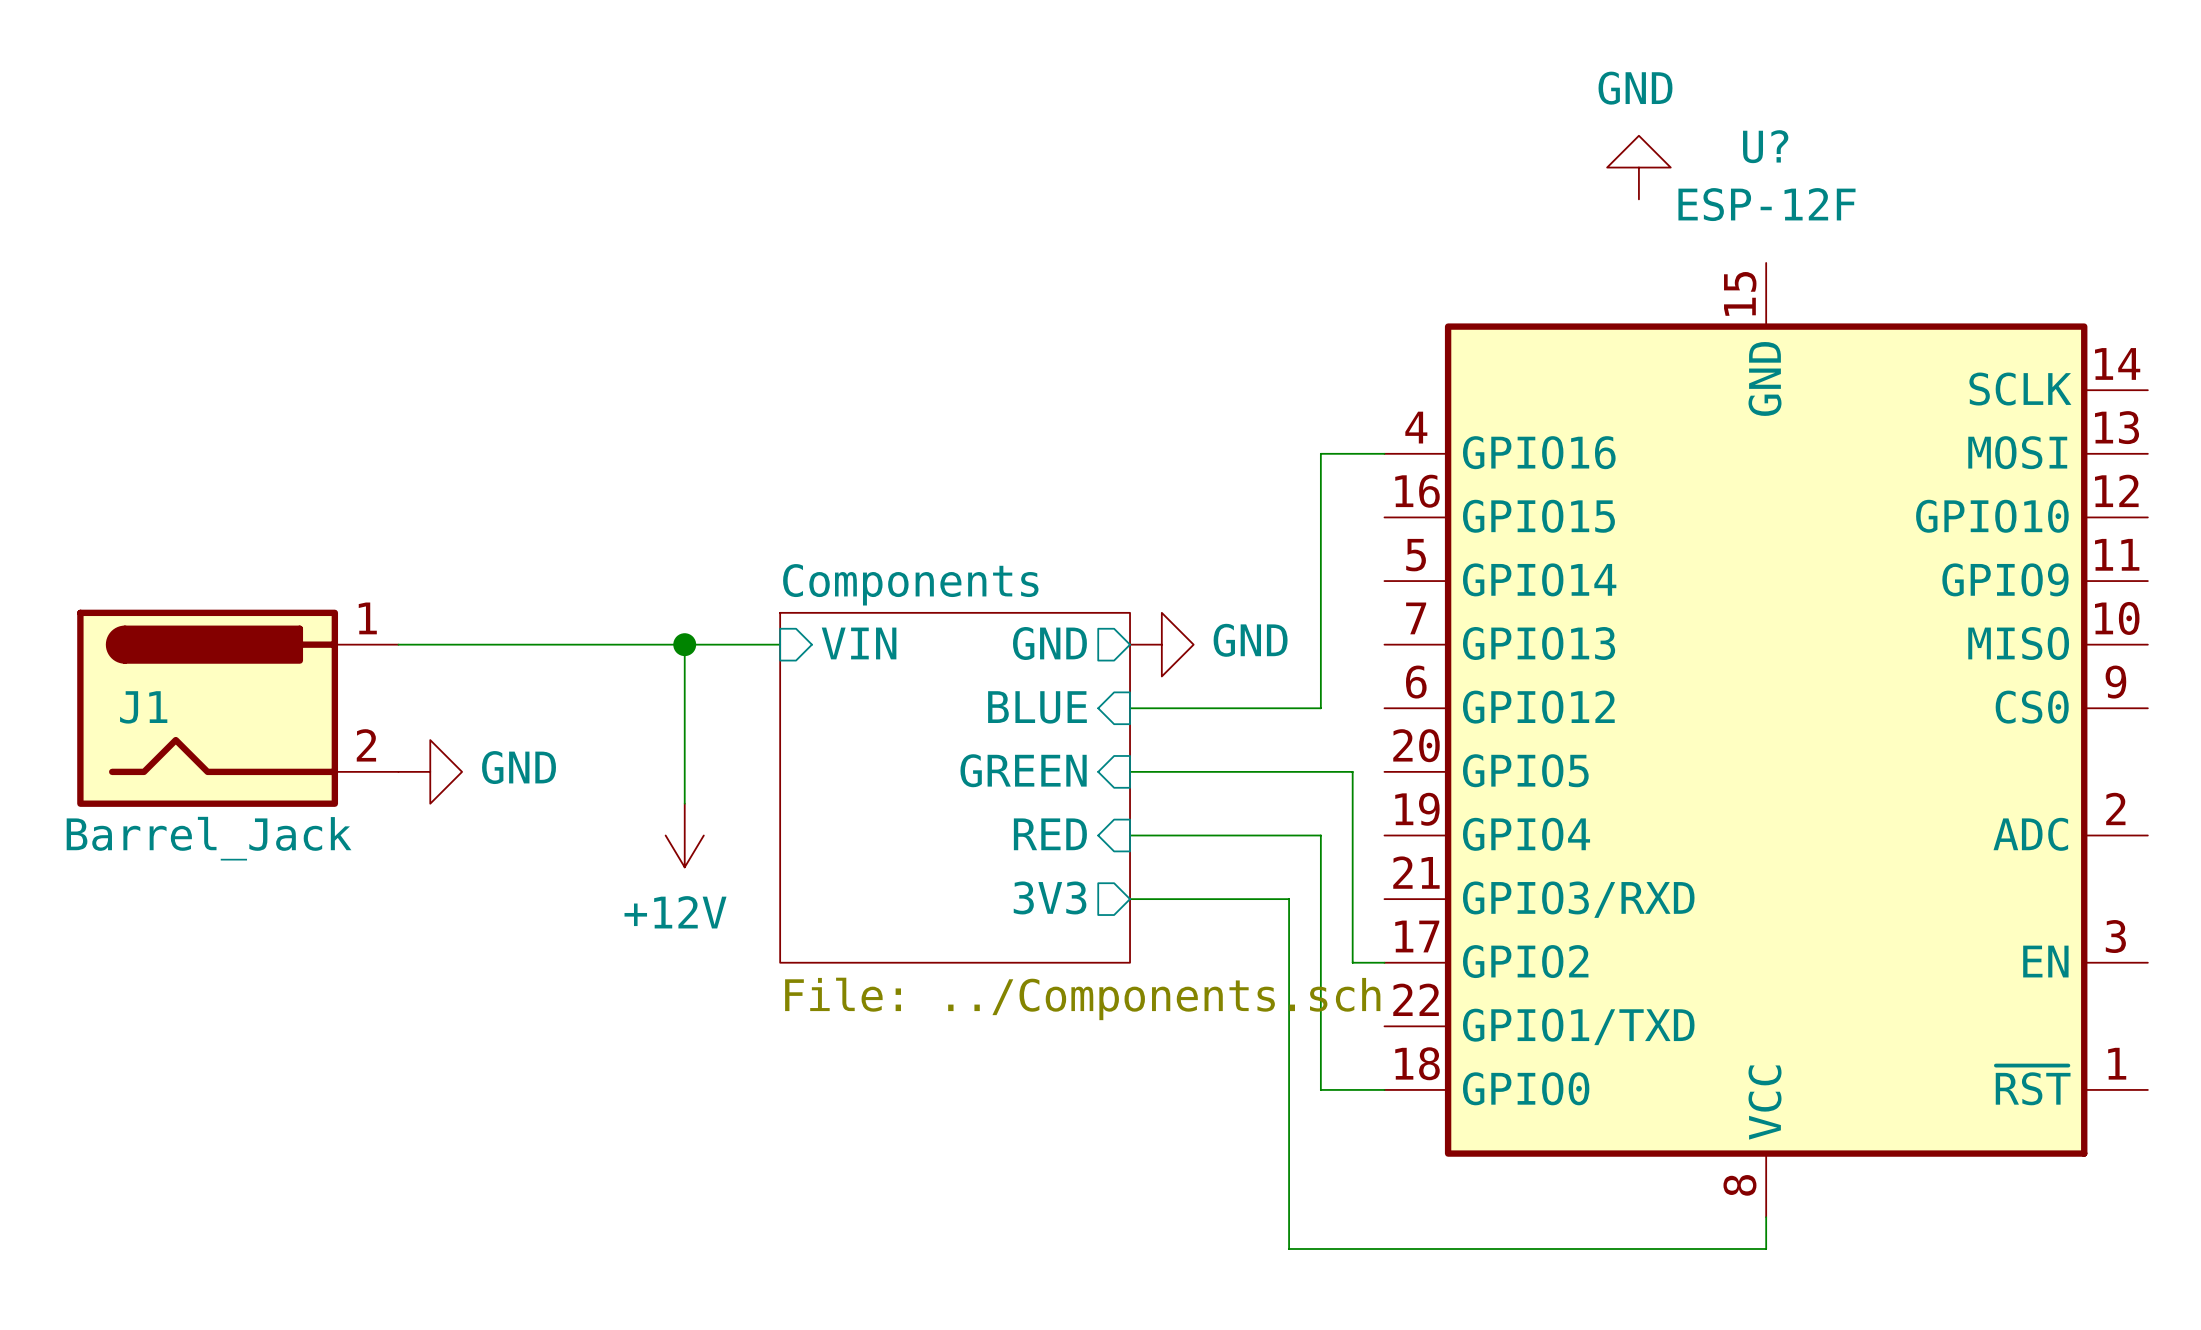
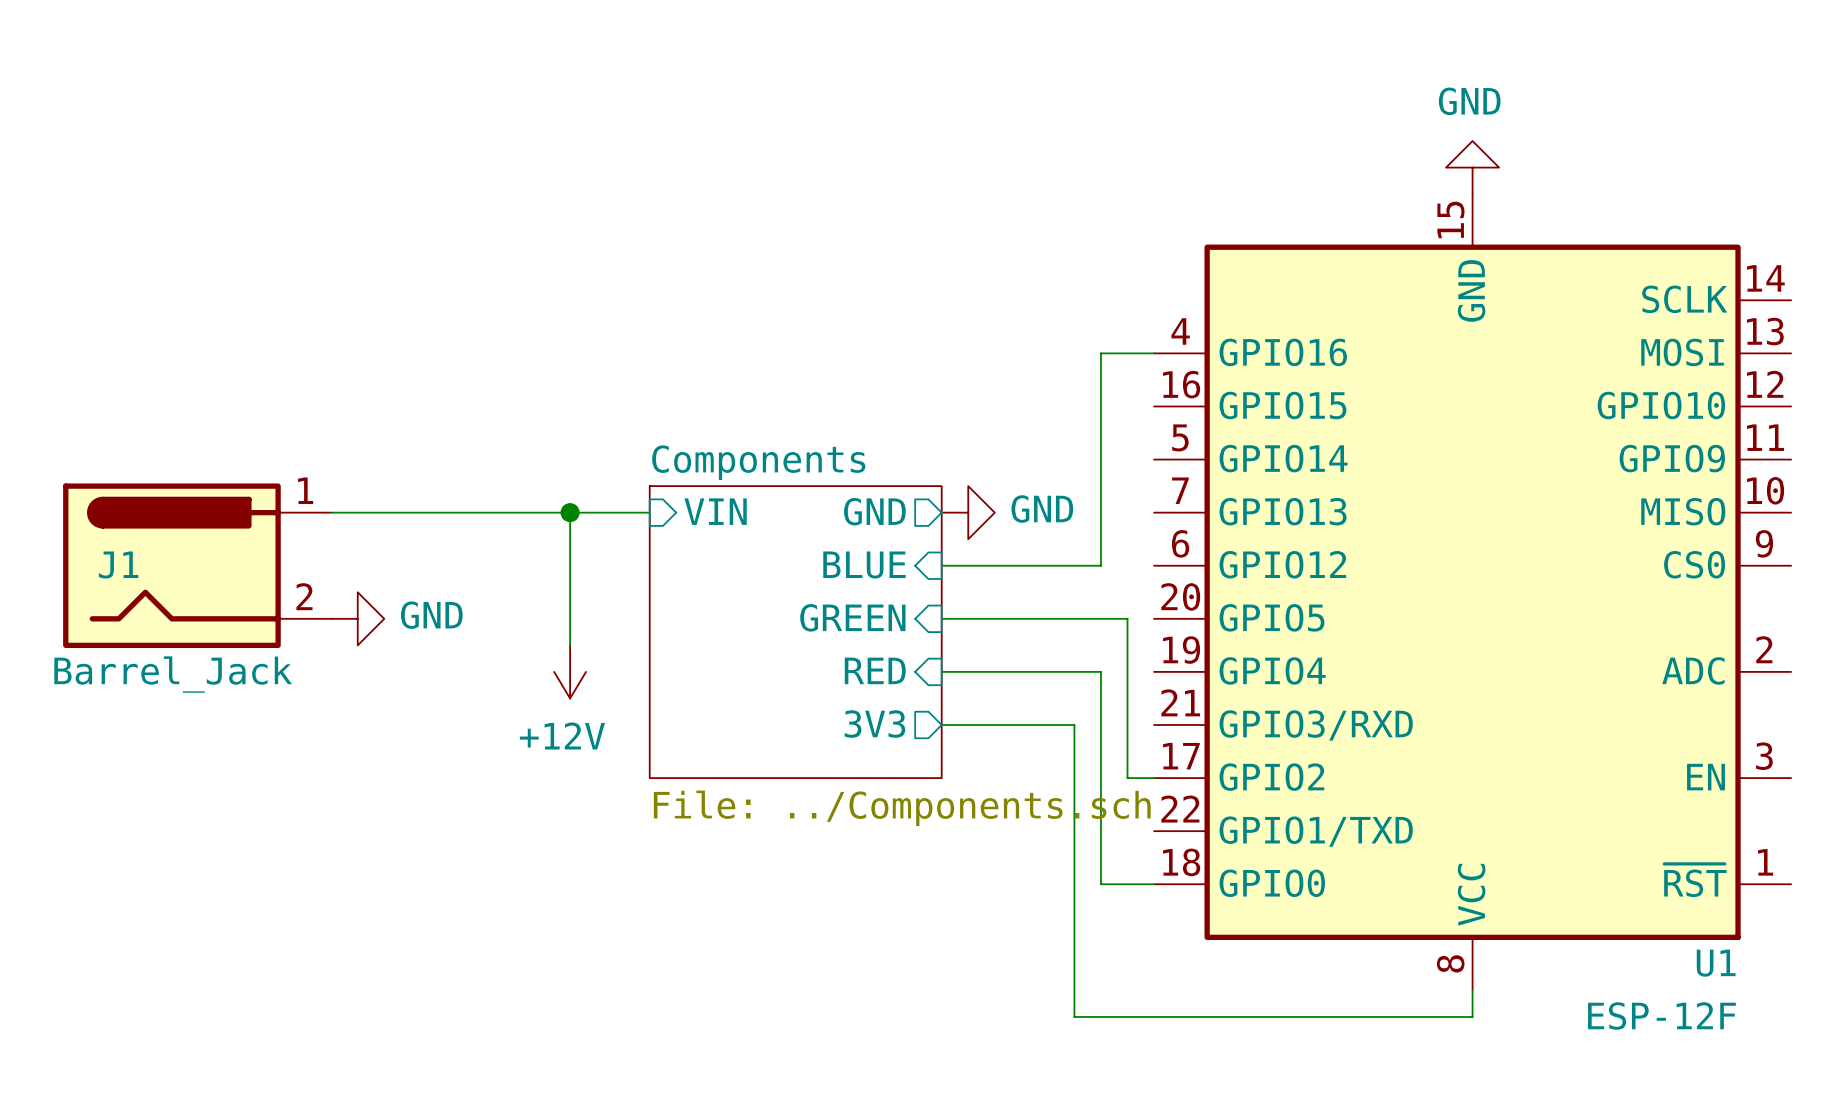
U? name: U? (1765, 146) -> U1 (1716, 963)
power symbol position: GND (1638, 167) -> GND (1472, 167)
U? value position: ESP-12F (1766, 204) -> ESP-12F (1661, 1016)

